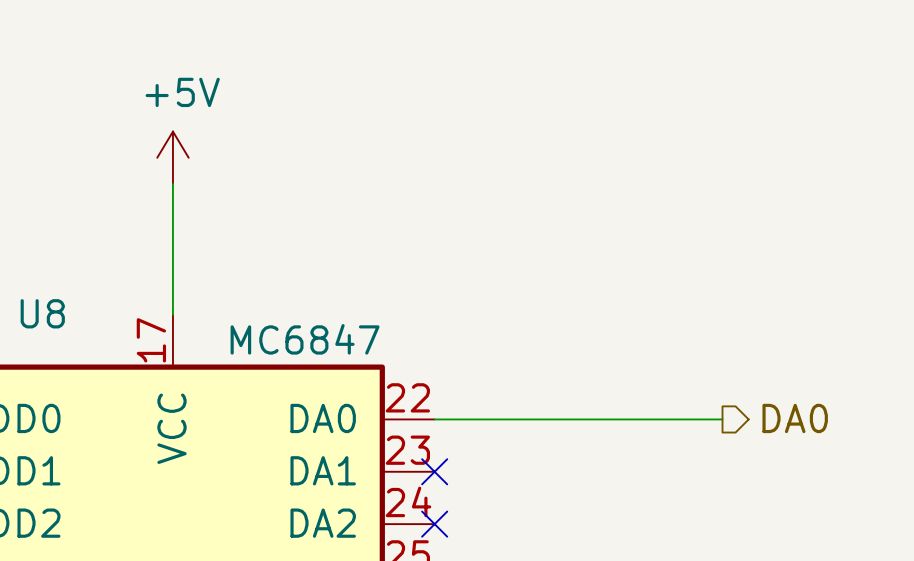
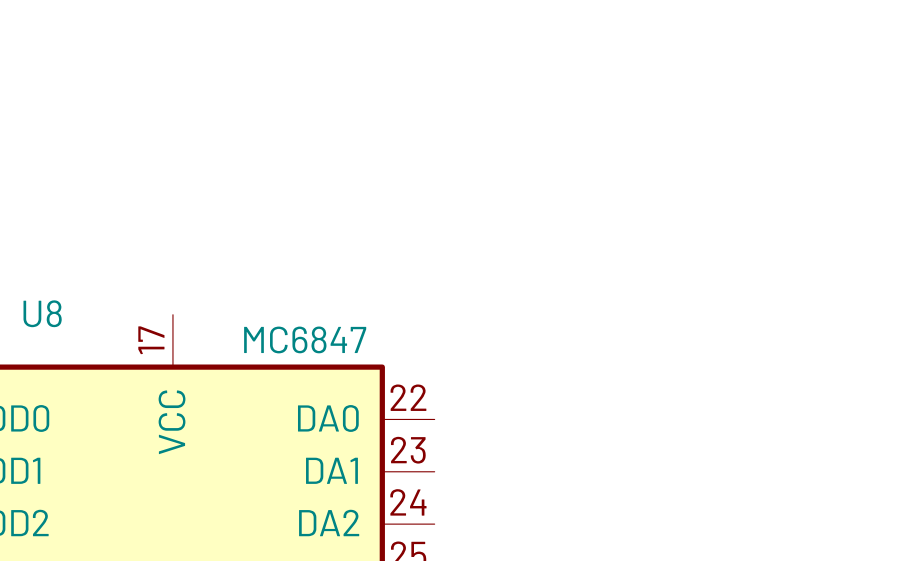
power symbol: +5V (172, 157) -> none
wire: (172, 183) (172, 314) -> none
hierarchical label: DA0 (795, 418) -> none
wire: (434, 419) (722, 419) -> none
no-connect mark: (434, 471) -> none
no-connect mark: (434, 524) -> none

